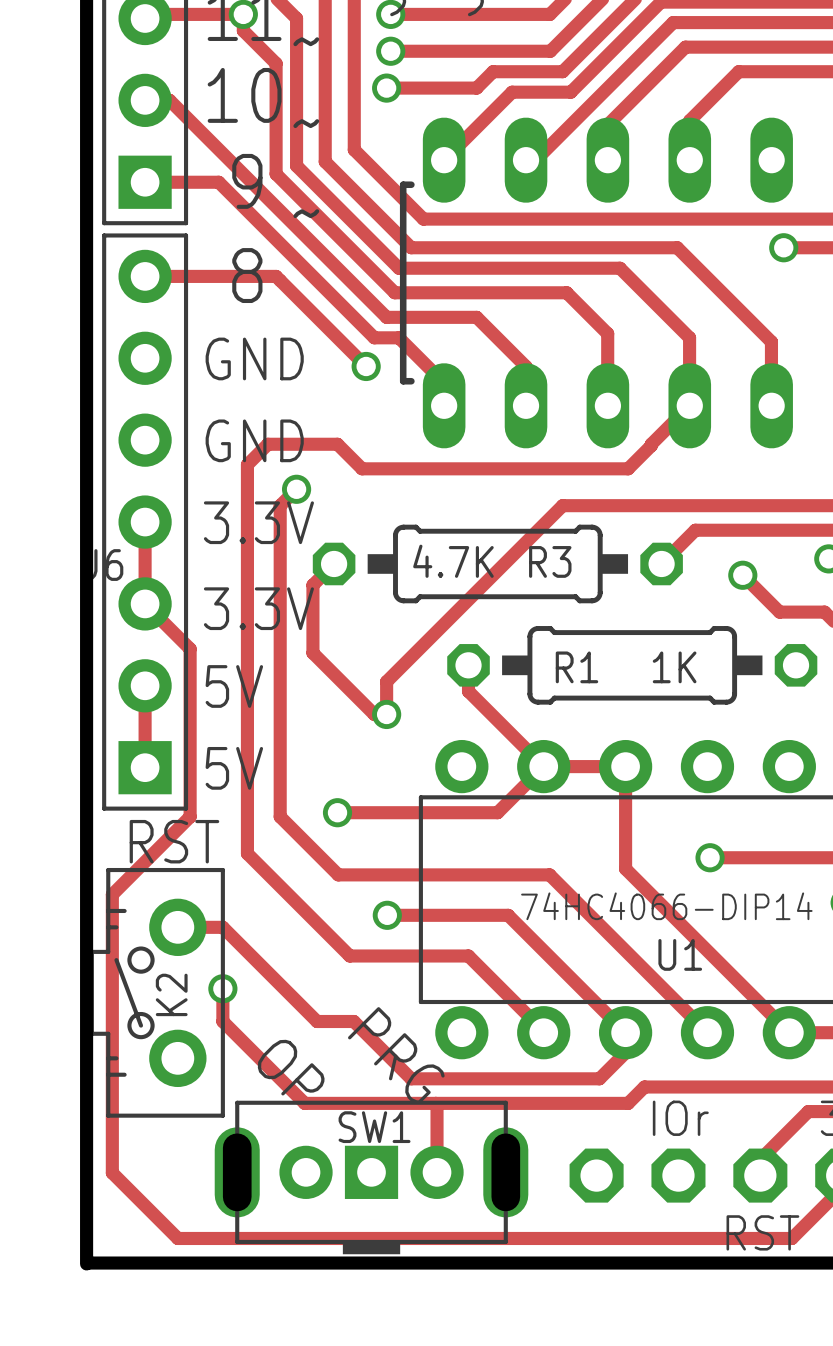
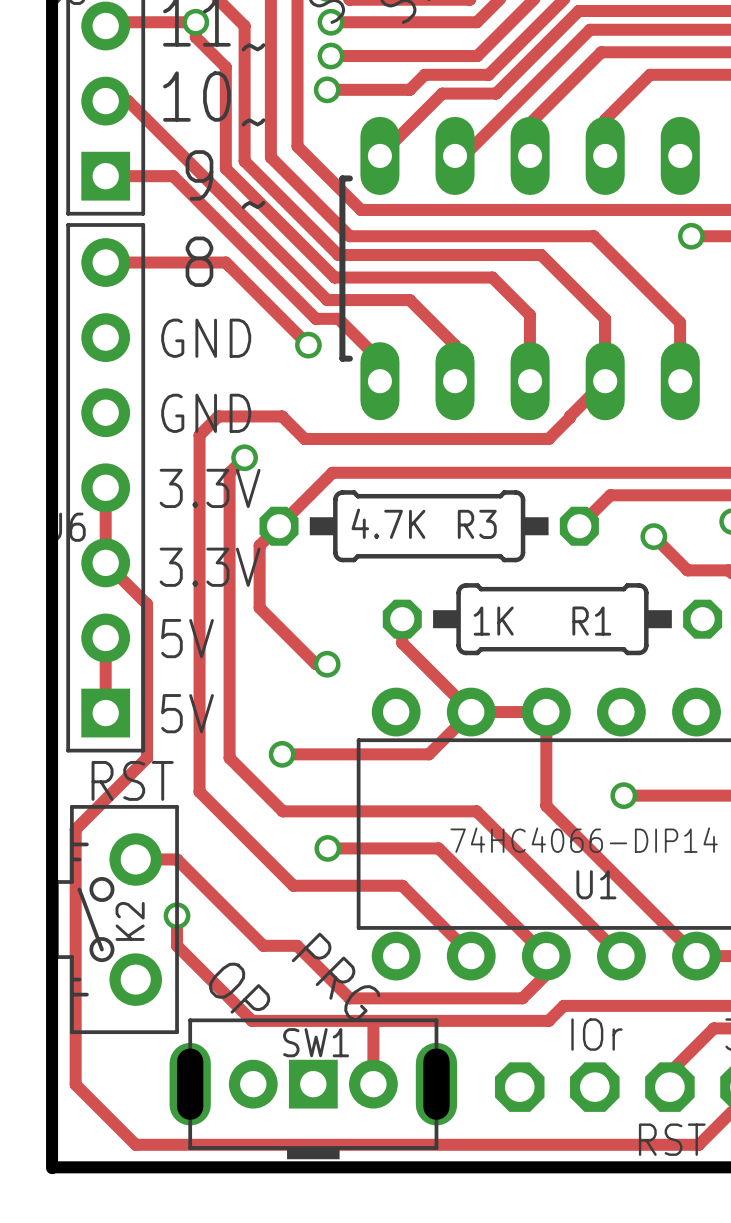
track: (562, 505) (386, 681) (386, 714) -> (488, 472) (332, 472) (279, 526)
R1 name position: R1 (576, 667) -> R1 (591, 621)
R1 value position: 1K (674, 667) -> 1K (493, 621)

